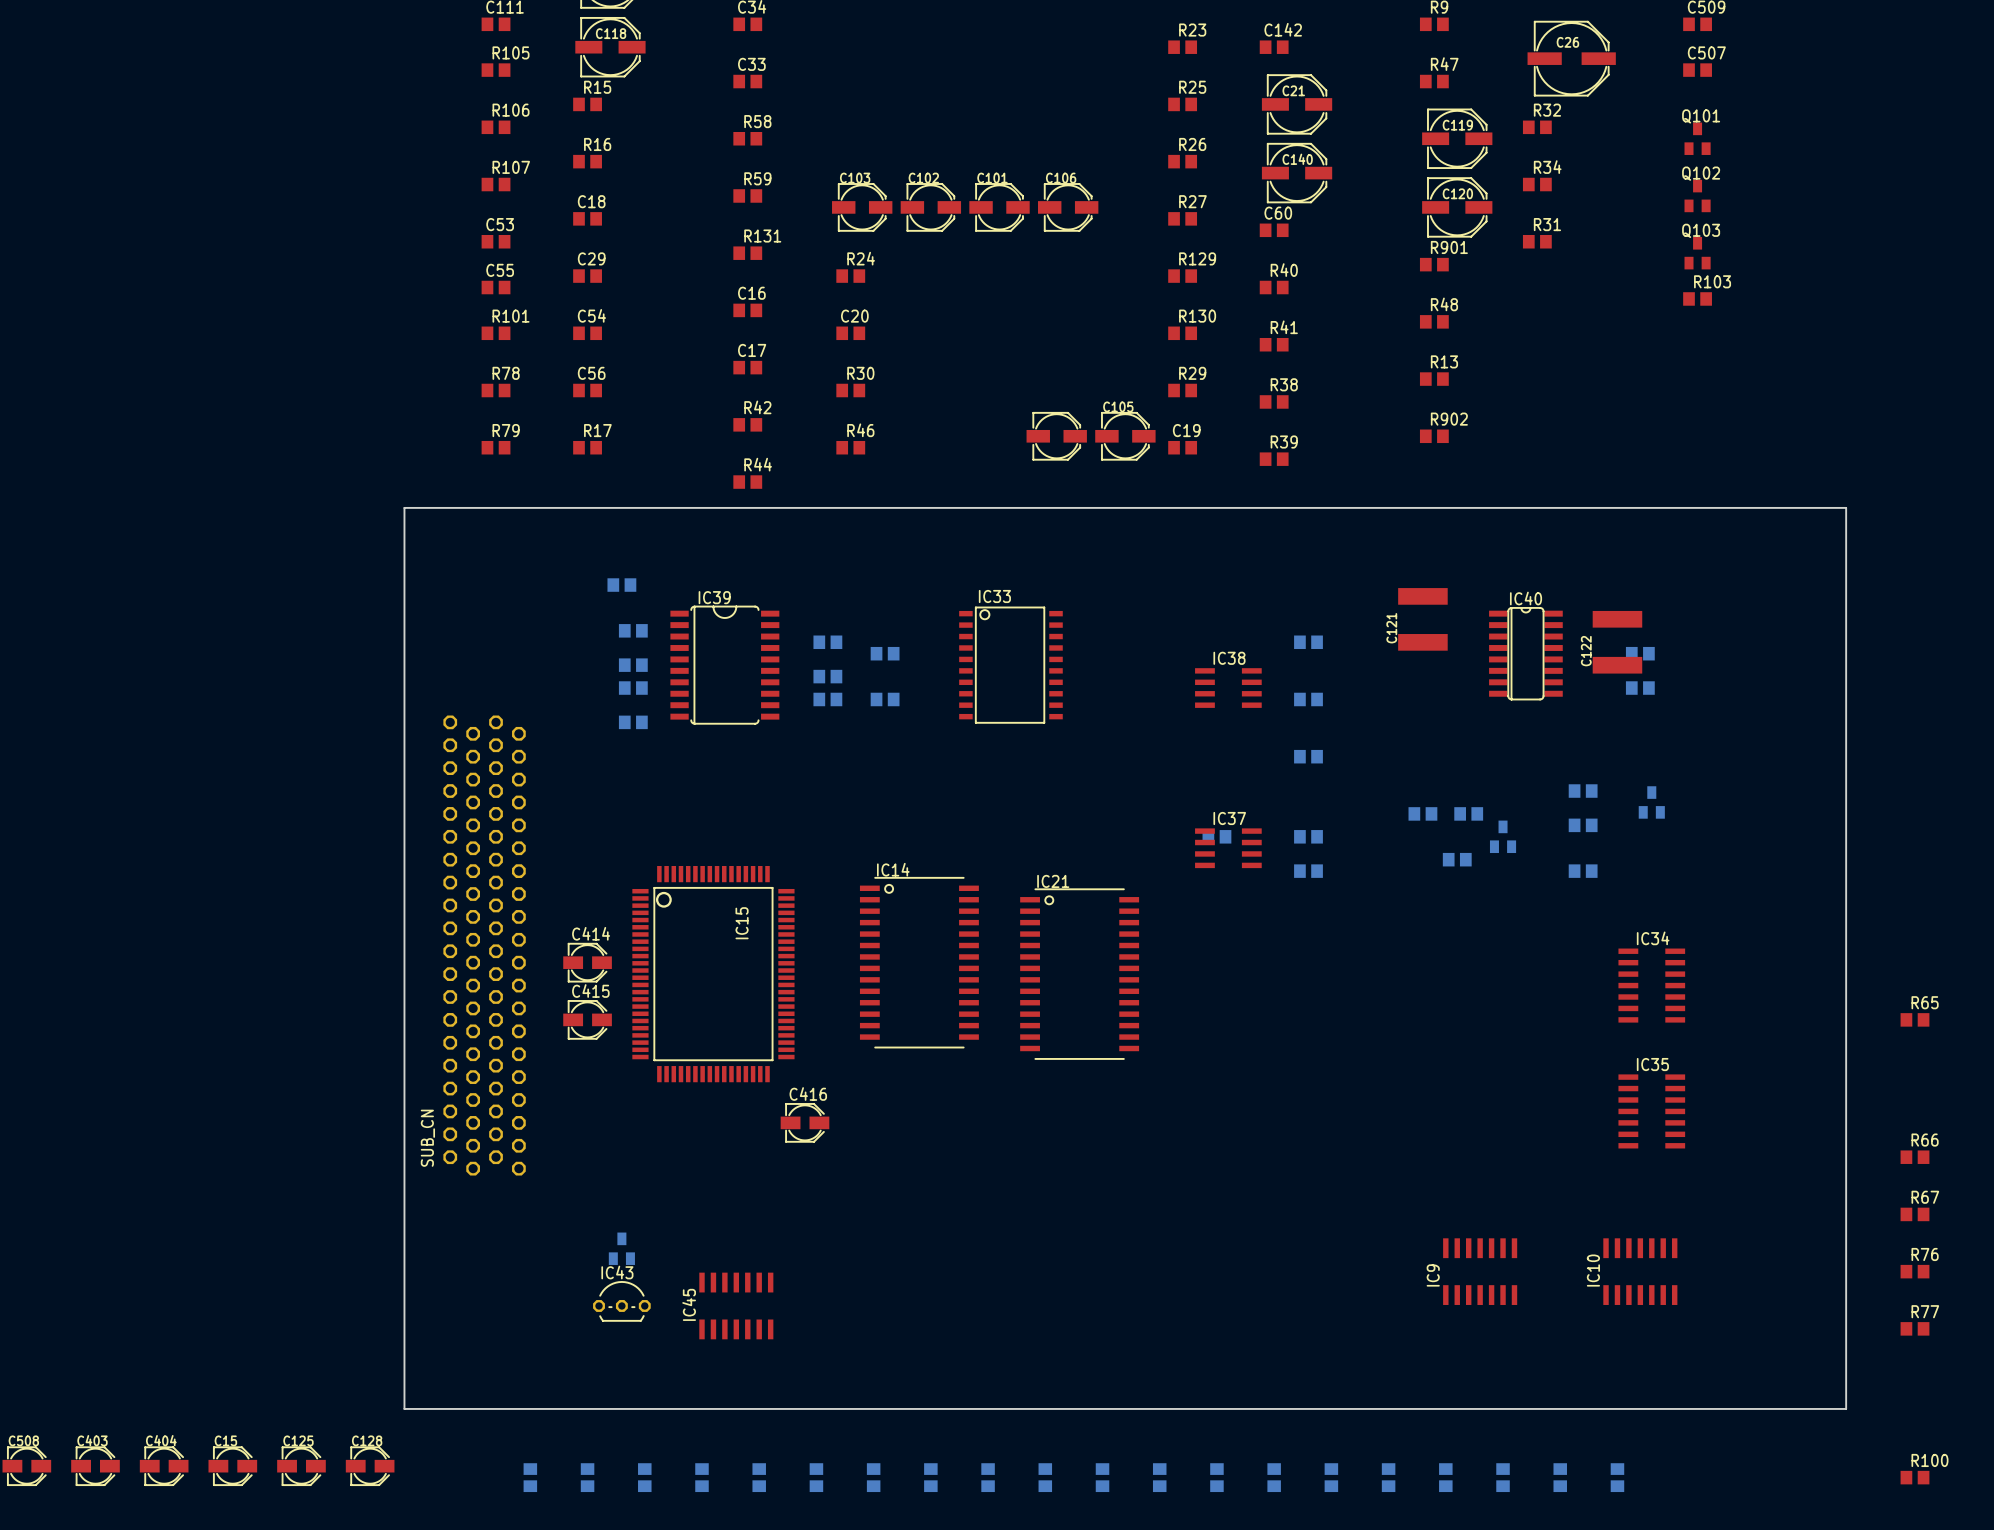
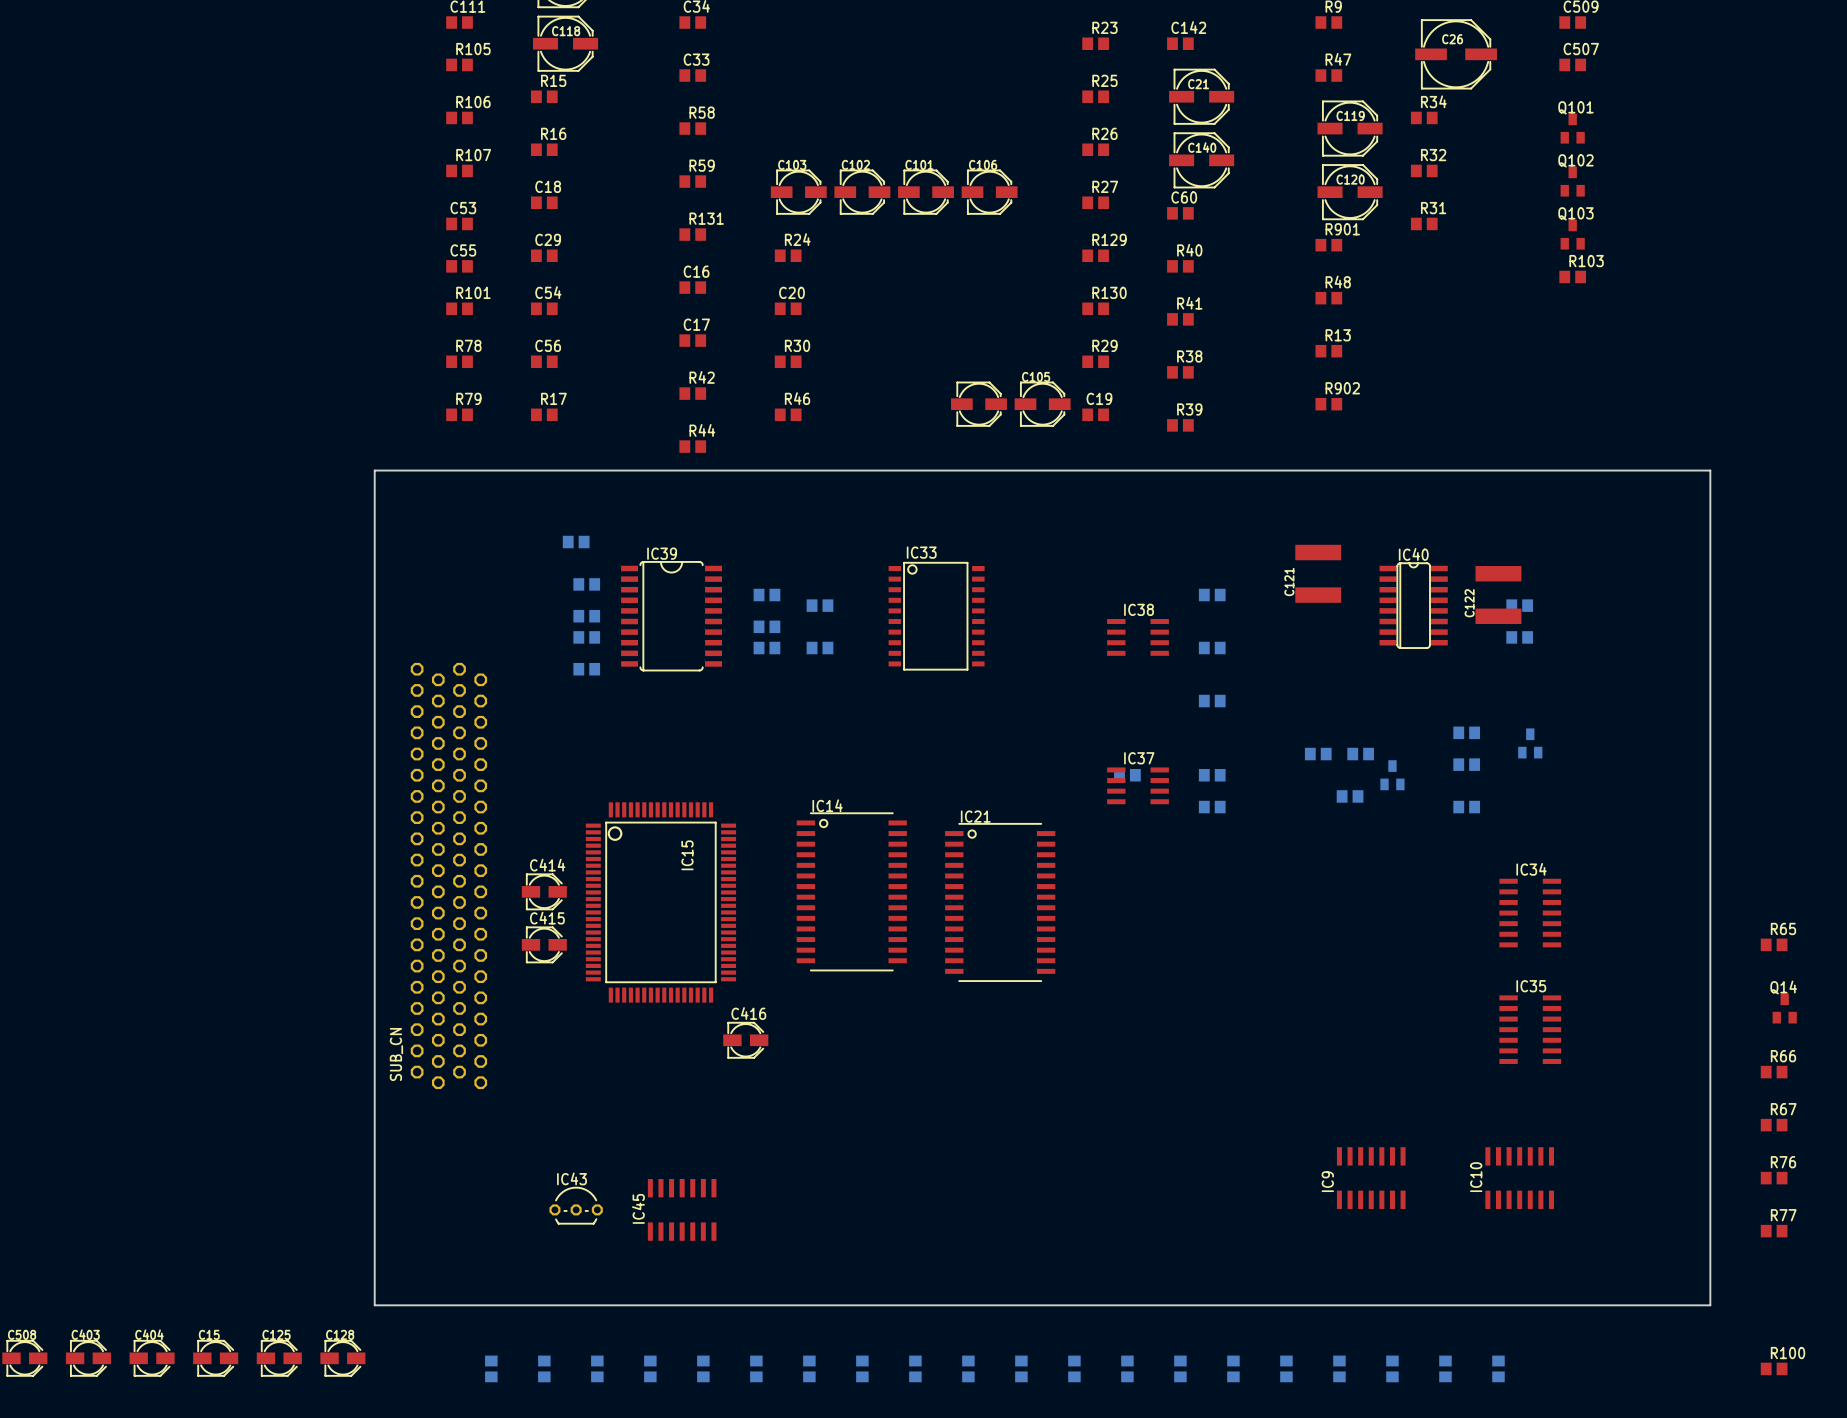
R32 name: R32 (1547, 110) -> R34 (1433, 101)
R34 name: R34 (1547, 167) -> R32 (1433, 155)
Q14: none -> (1784, 1008)
part: (621, 1248) -> none

